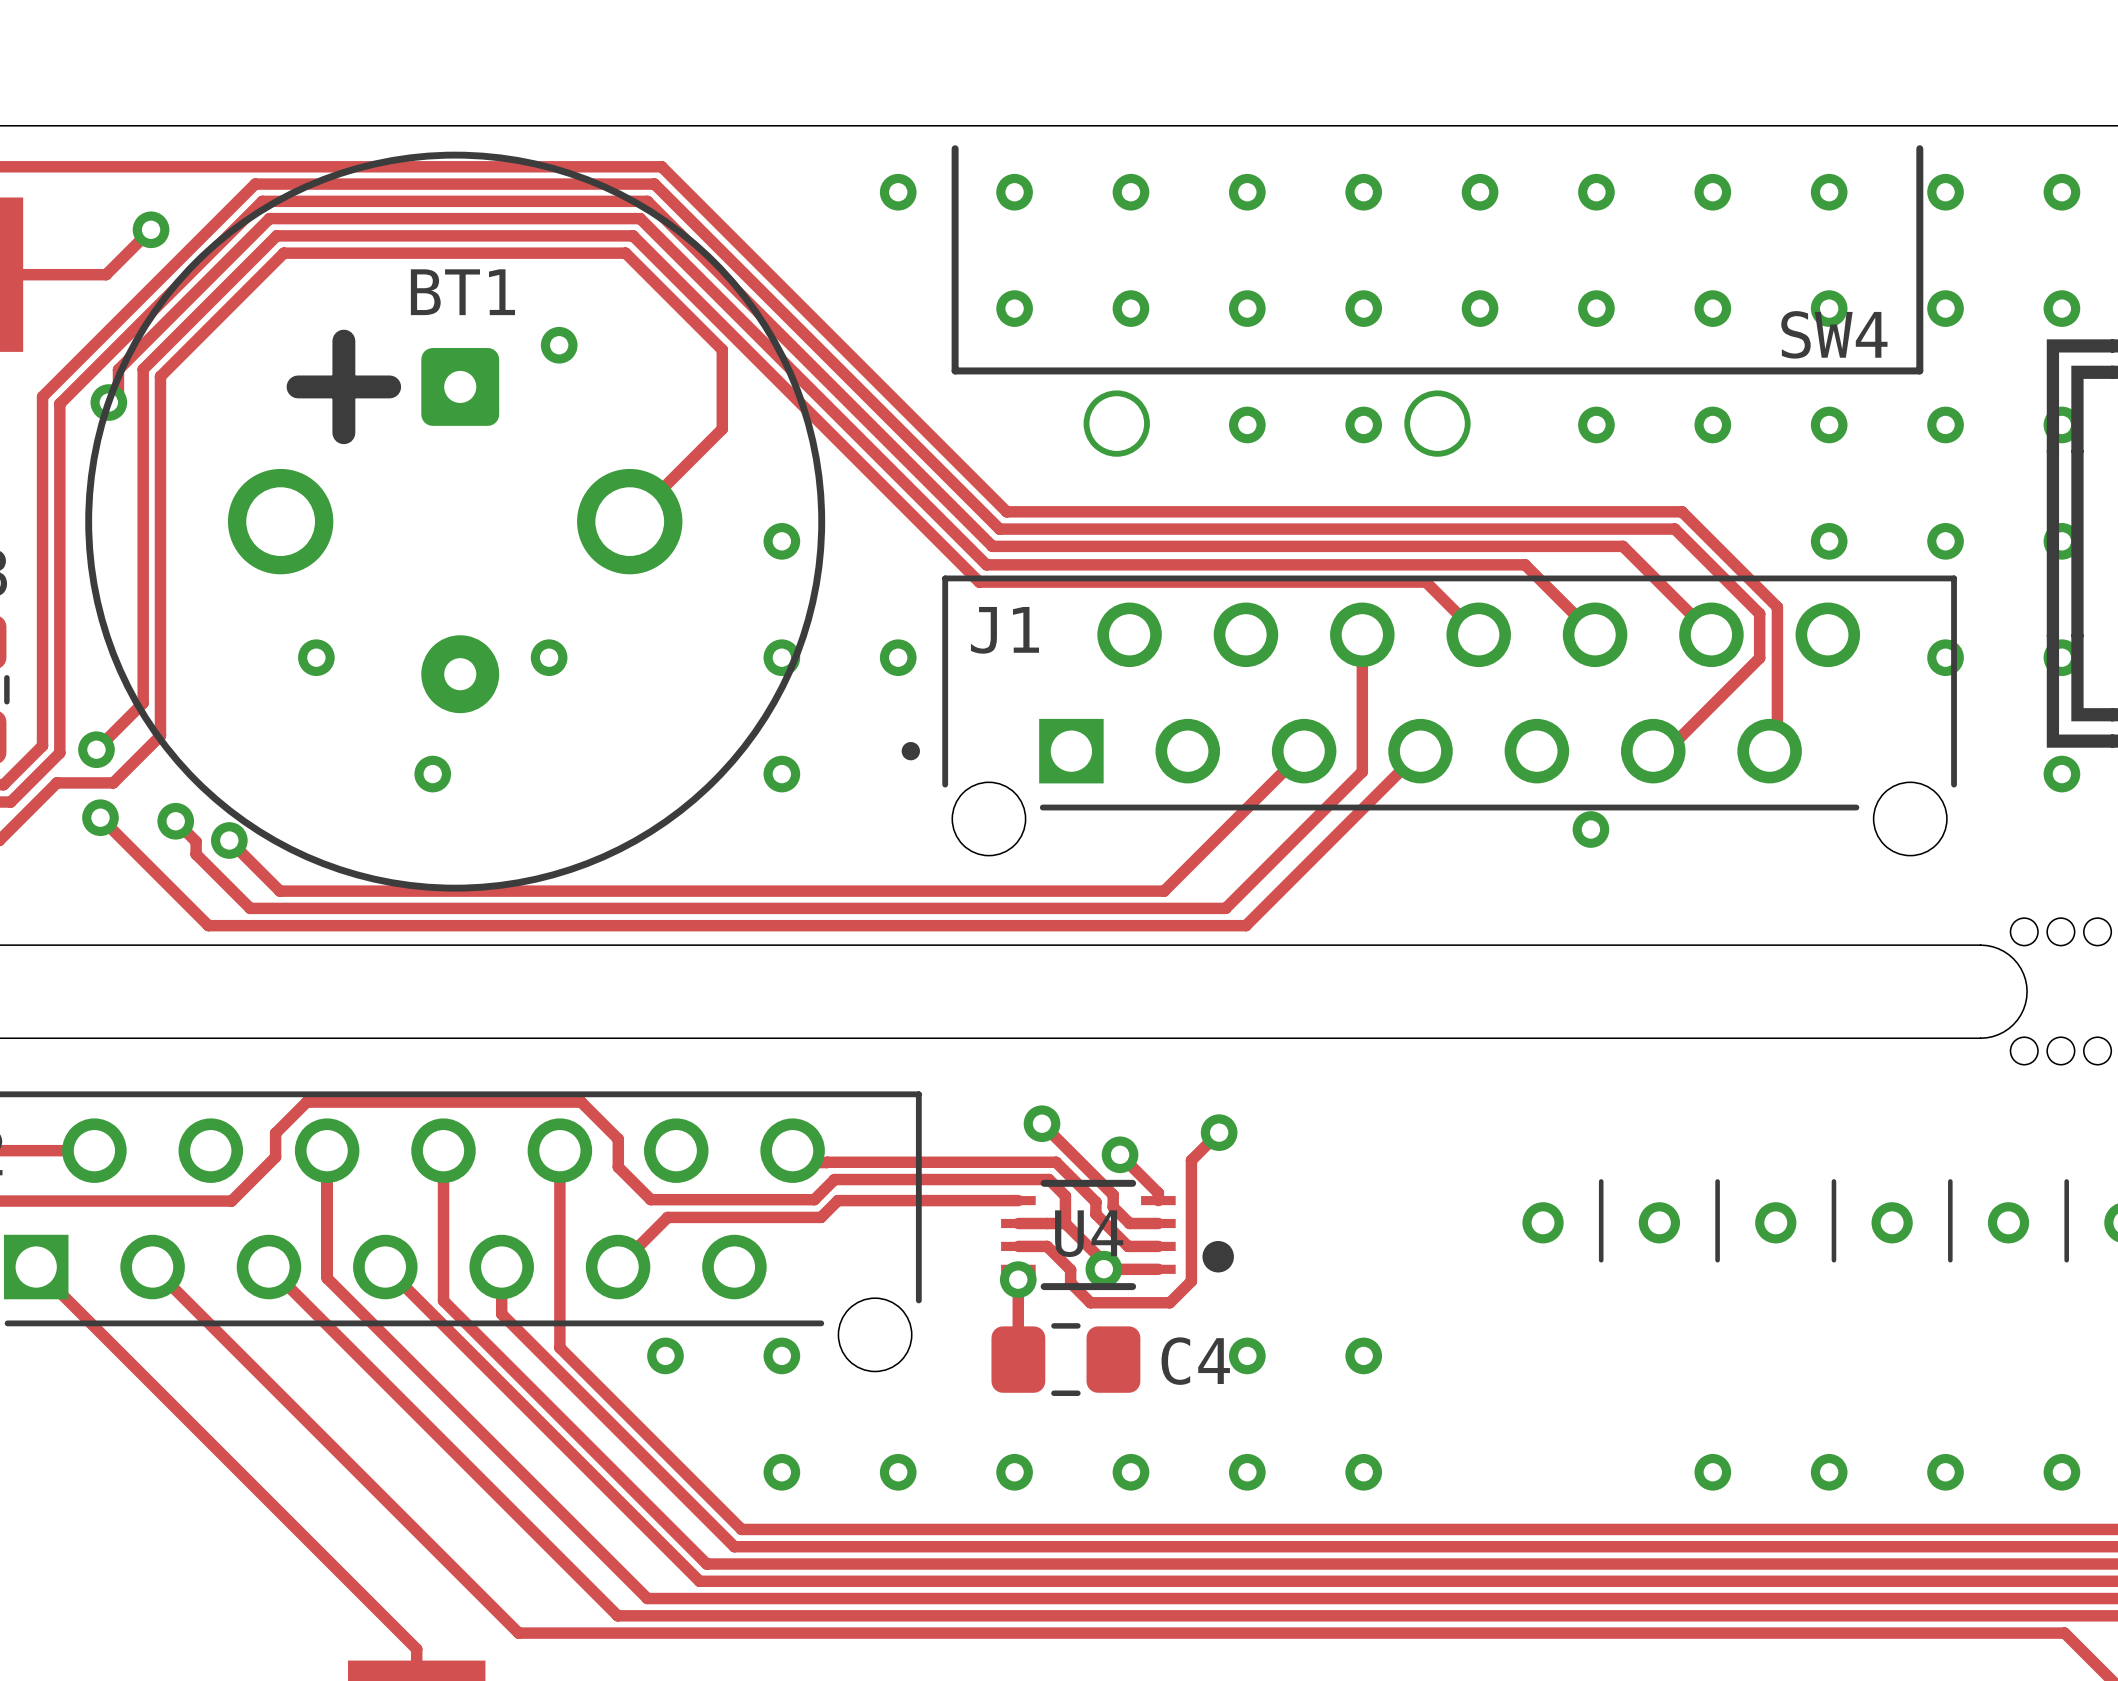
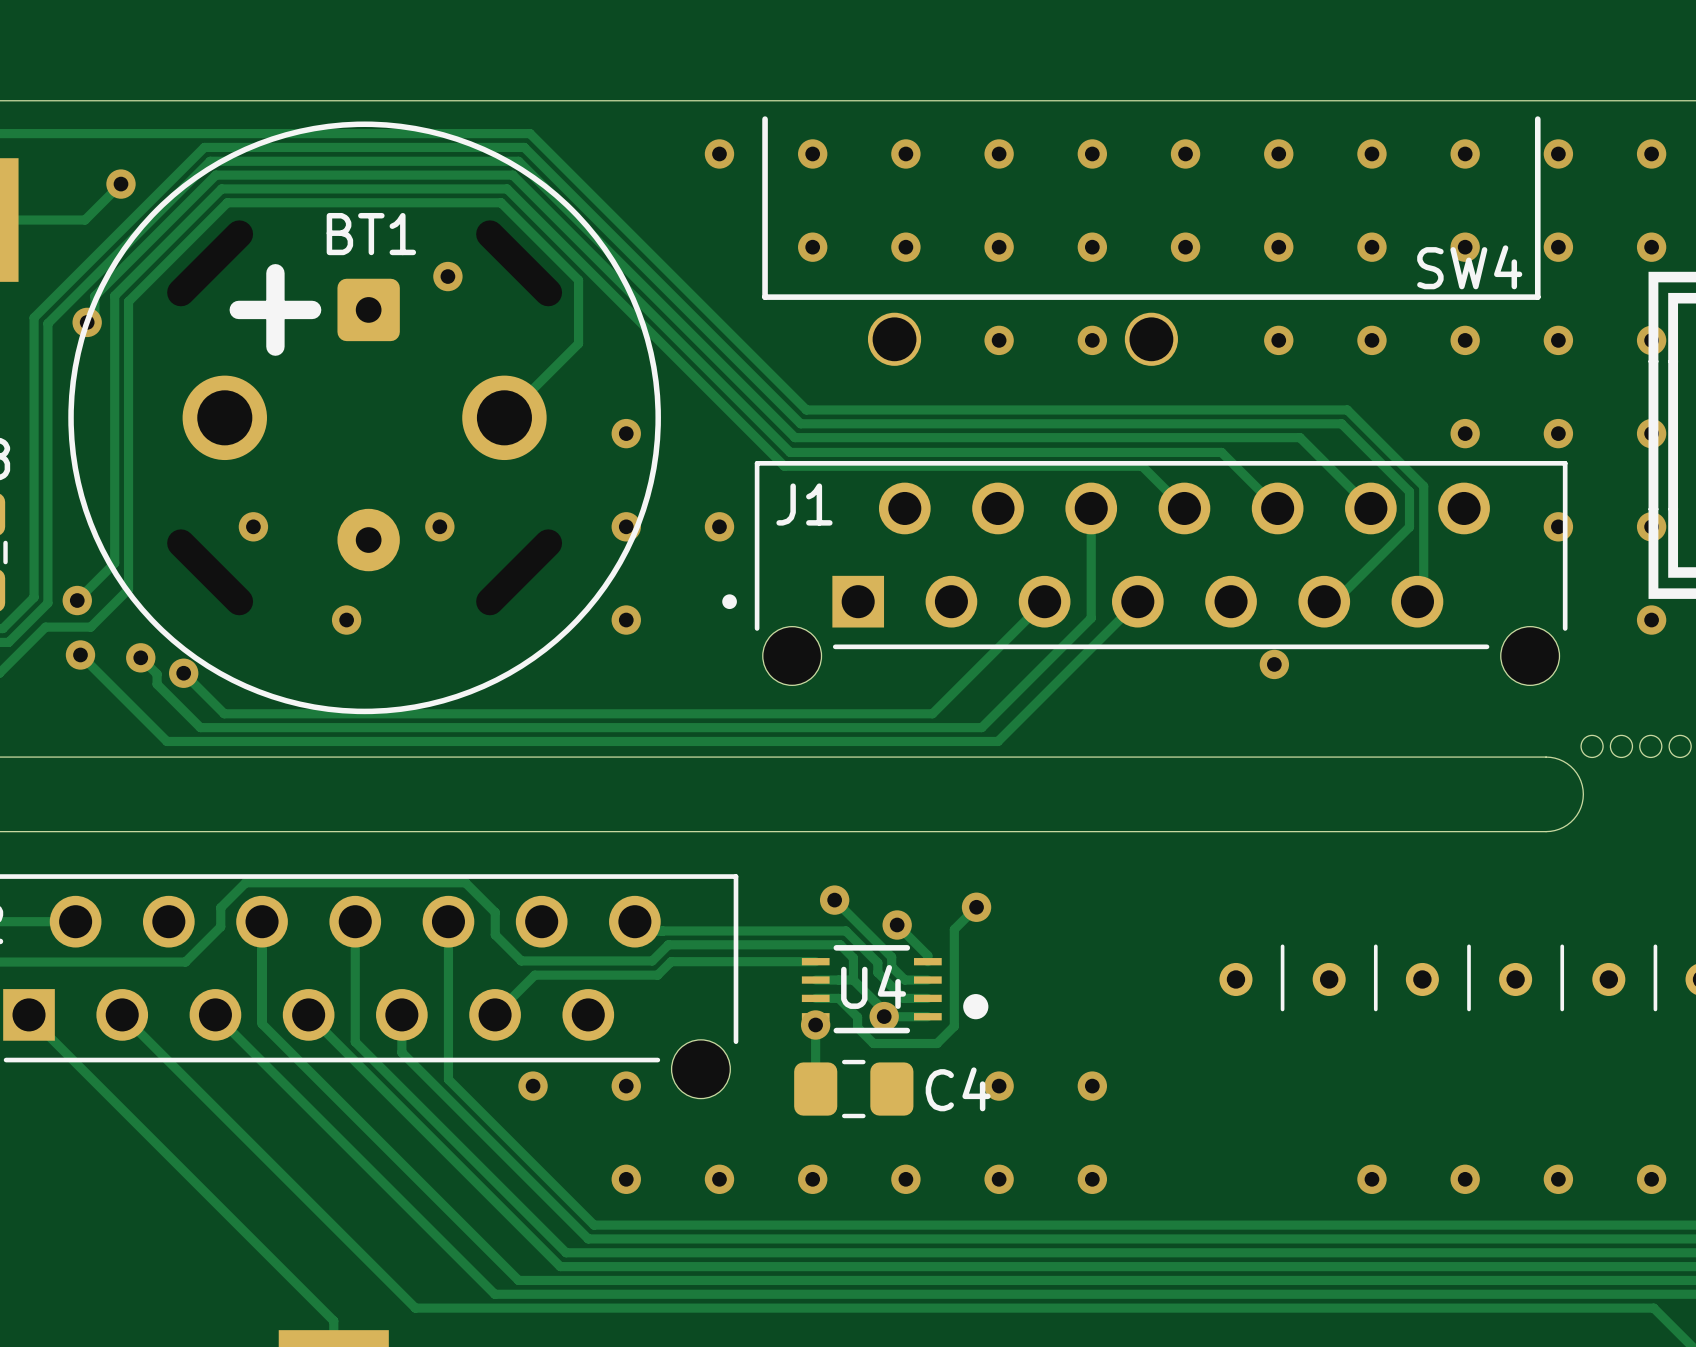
round board edge: none -> [1581, 735, 1604, 758]
board edge: (1930, 945) (1980, 945) (1998, 948) (2008, 954) (2020, 968) (2025, 979) (2027, 991) (2025, 1003) (2020, 1014) (2008, 1028) (1998, 1034) (1980, 1038) (1930, 1038) -> (1546, 757) (1559, 759) (1570, 766) (1580, 781) (1583, 794) (1580, 807) (1570, 822) (1559, 829) (1546, 831)
round board edge: [2010, 1037, 2039, 1065] -> none
round board edge: [2047, 1037, 2075, 1065] -> none
round board edge: [2083, 1037, 2112, 1065] -> none

